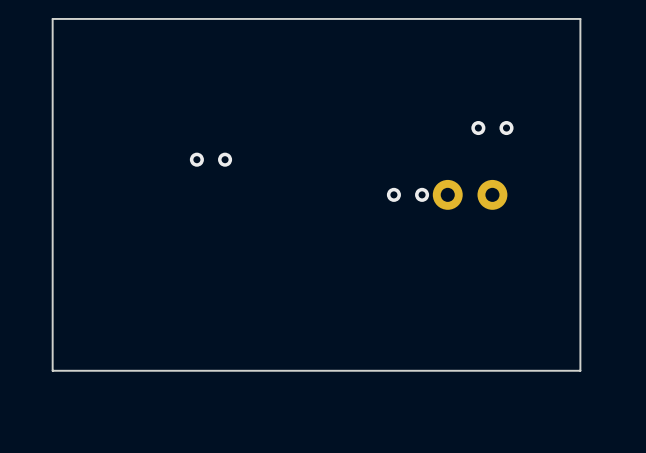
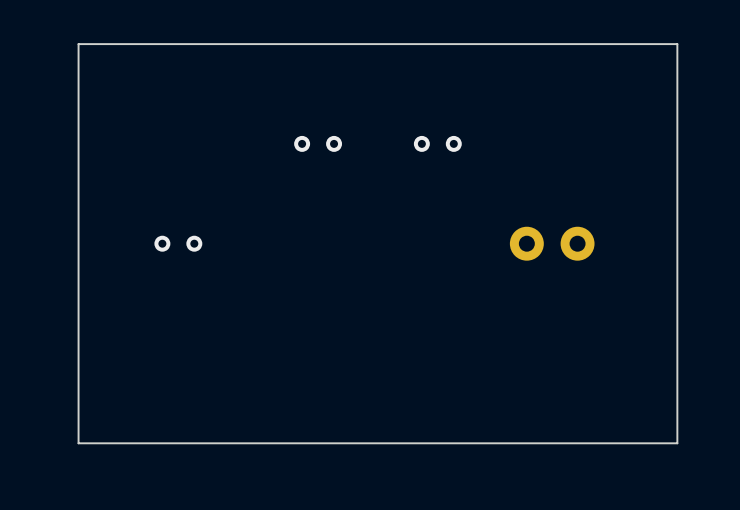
via: none -> (302, 143)
via: none -> (334, 143)
via: none -> (421, 143)
via: none -> (453, 143)
via: (478, 128) -> none
via: (506, 128) -> none
via: (196, 159) -> none
via: (225, 159) -> none
via: none -> (162, 243)
via: none -> (194, 243)
via: (393, 194) -> none
via: (422, 194) -> none

